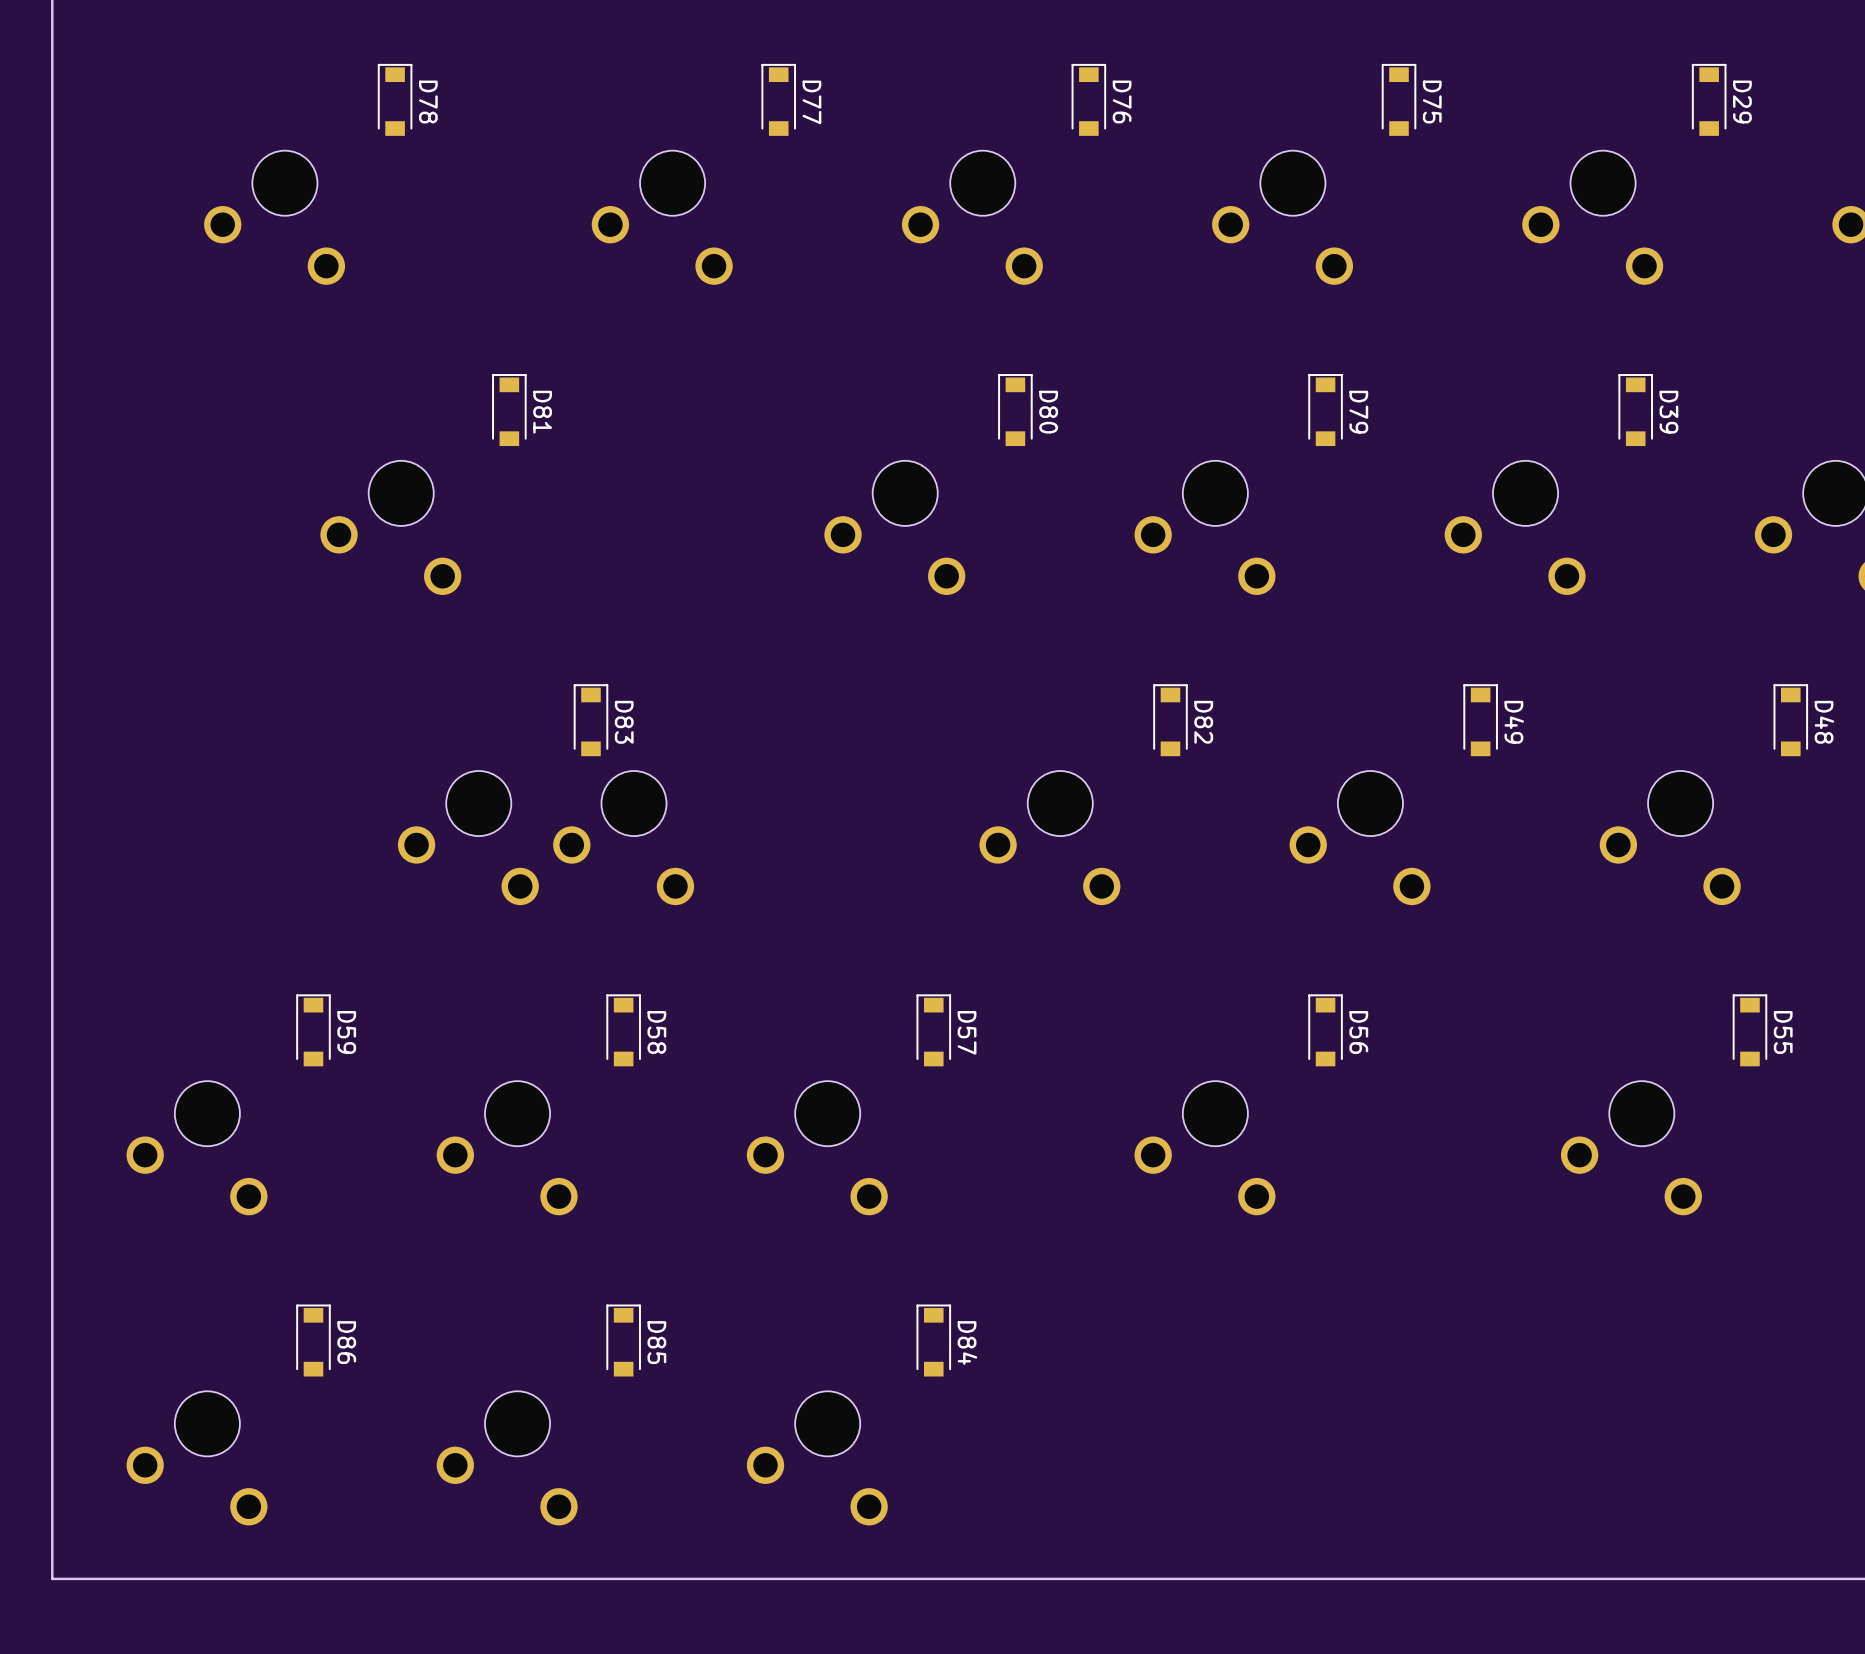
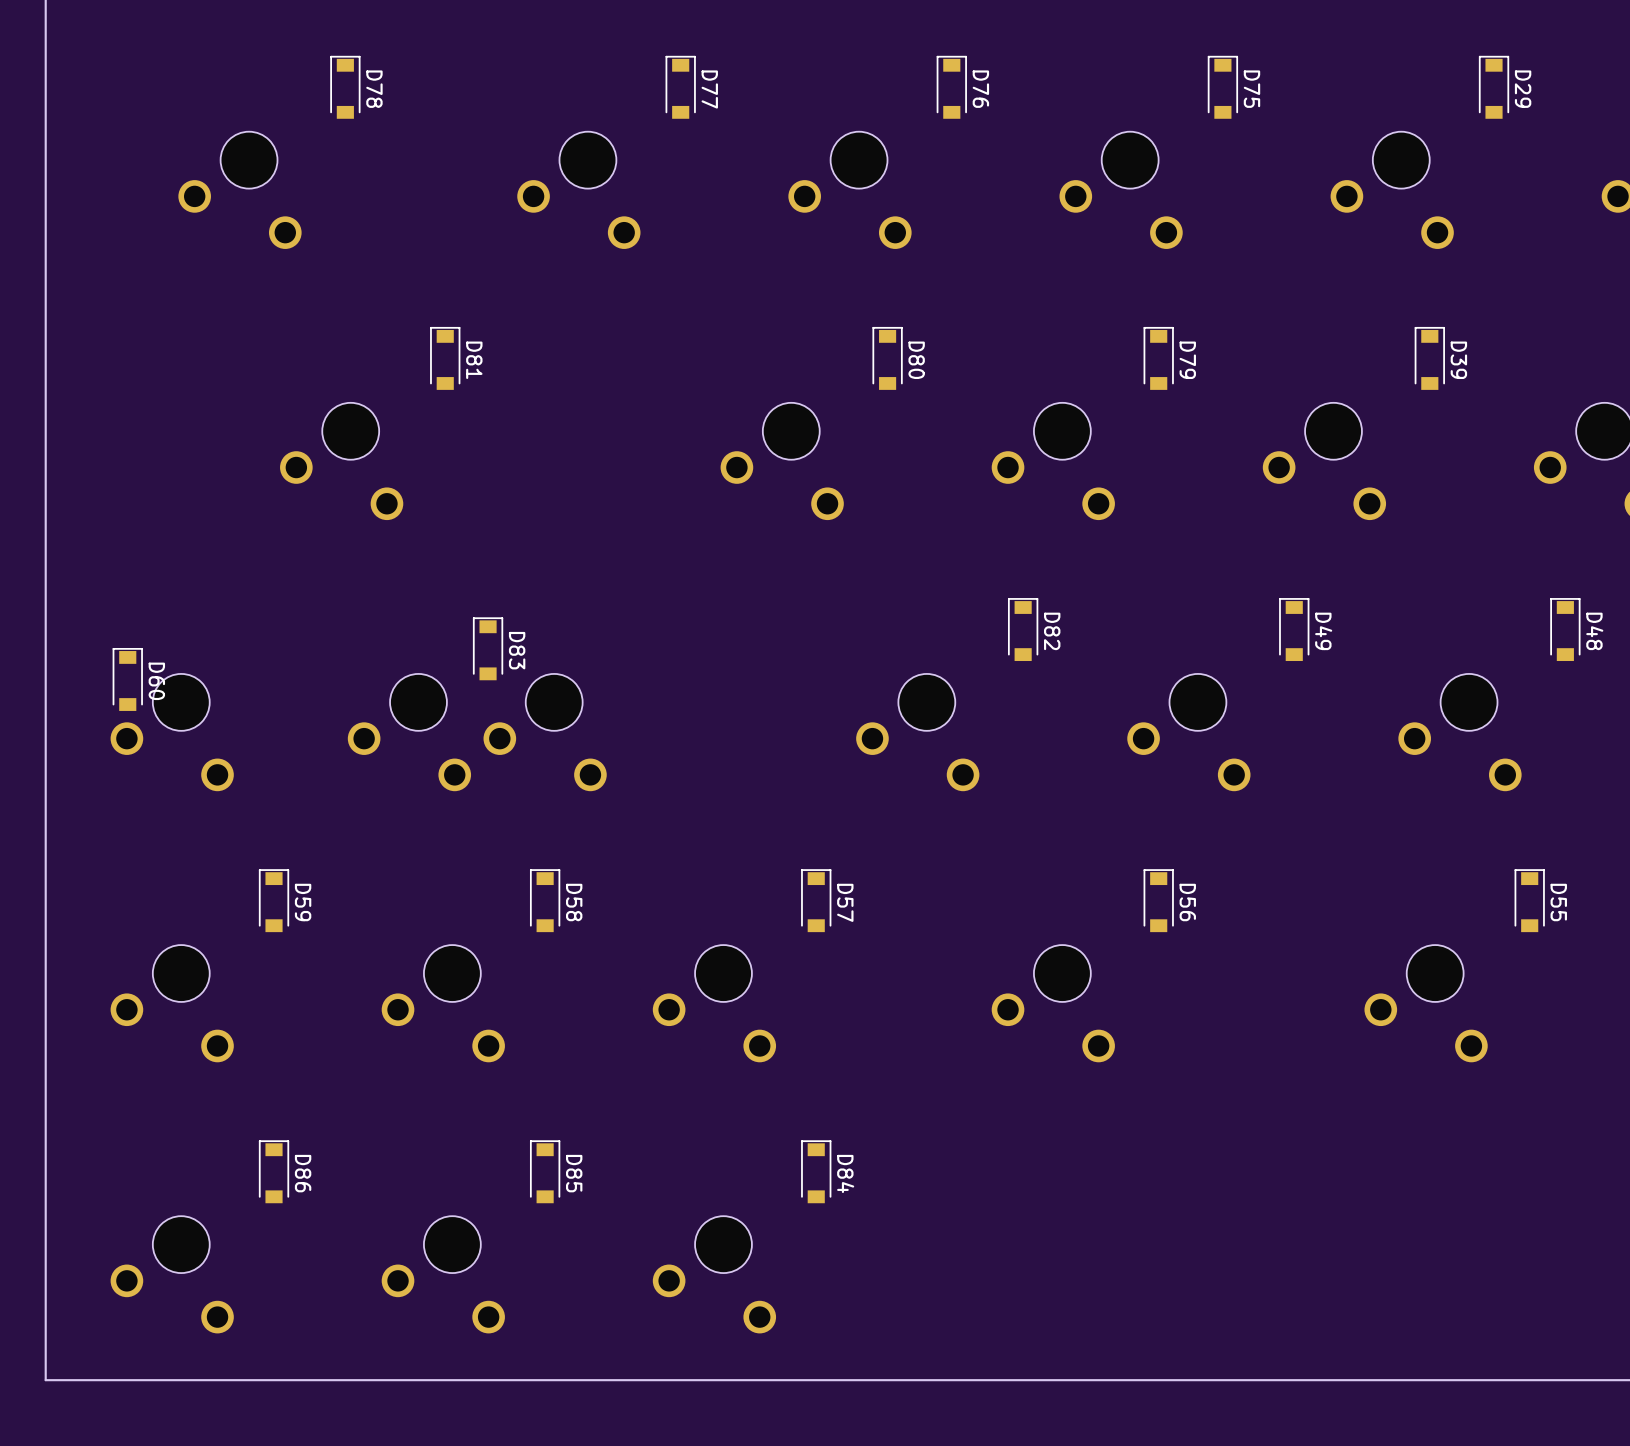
D83 position: (590, 720) -> (488, 648)
D60: none -> (127, 679)
part: none -> (172, 732)

